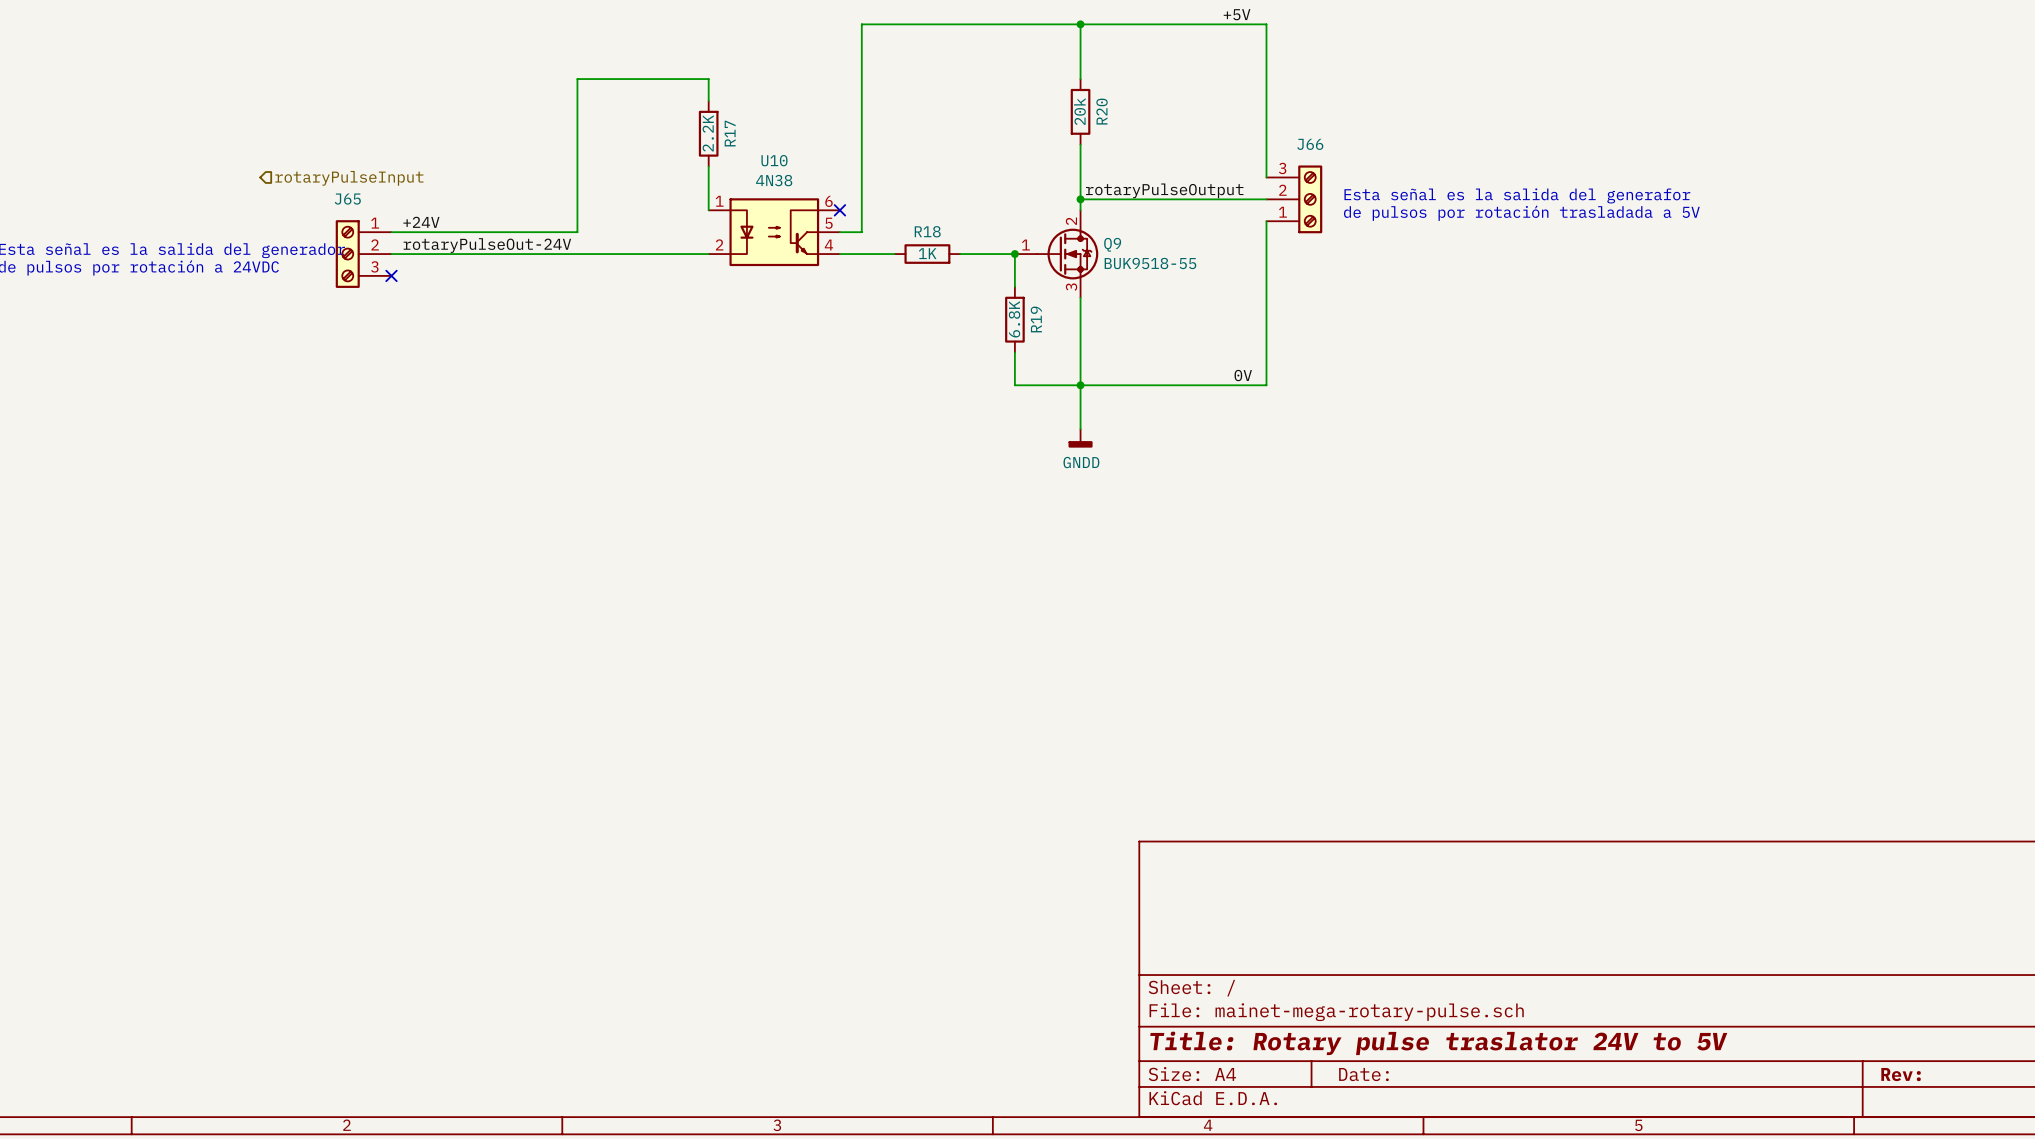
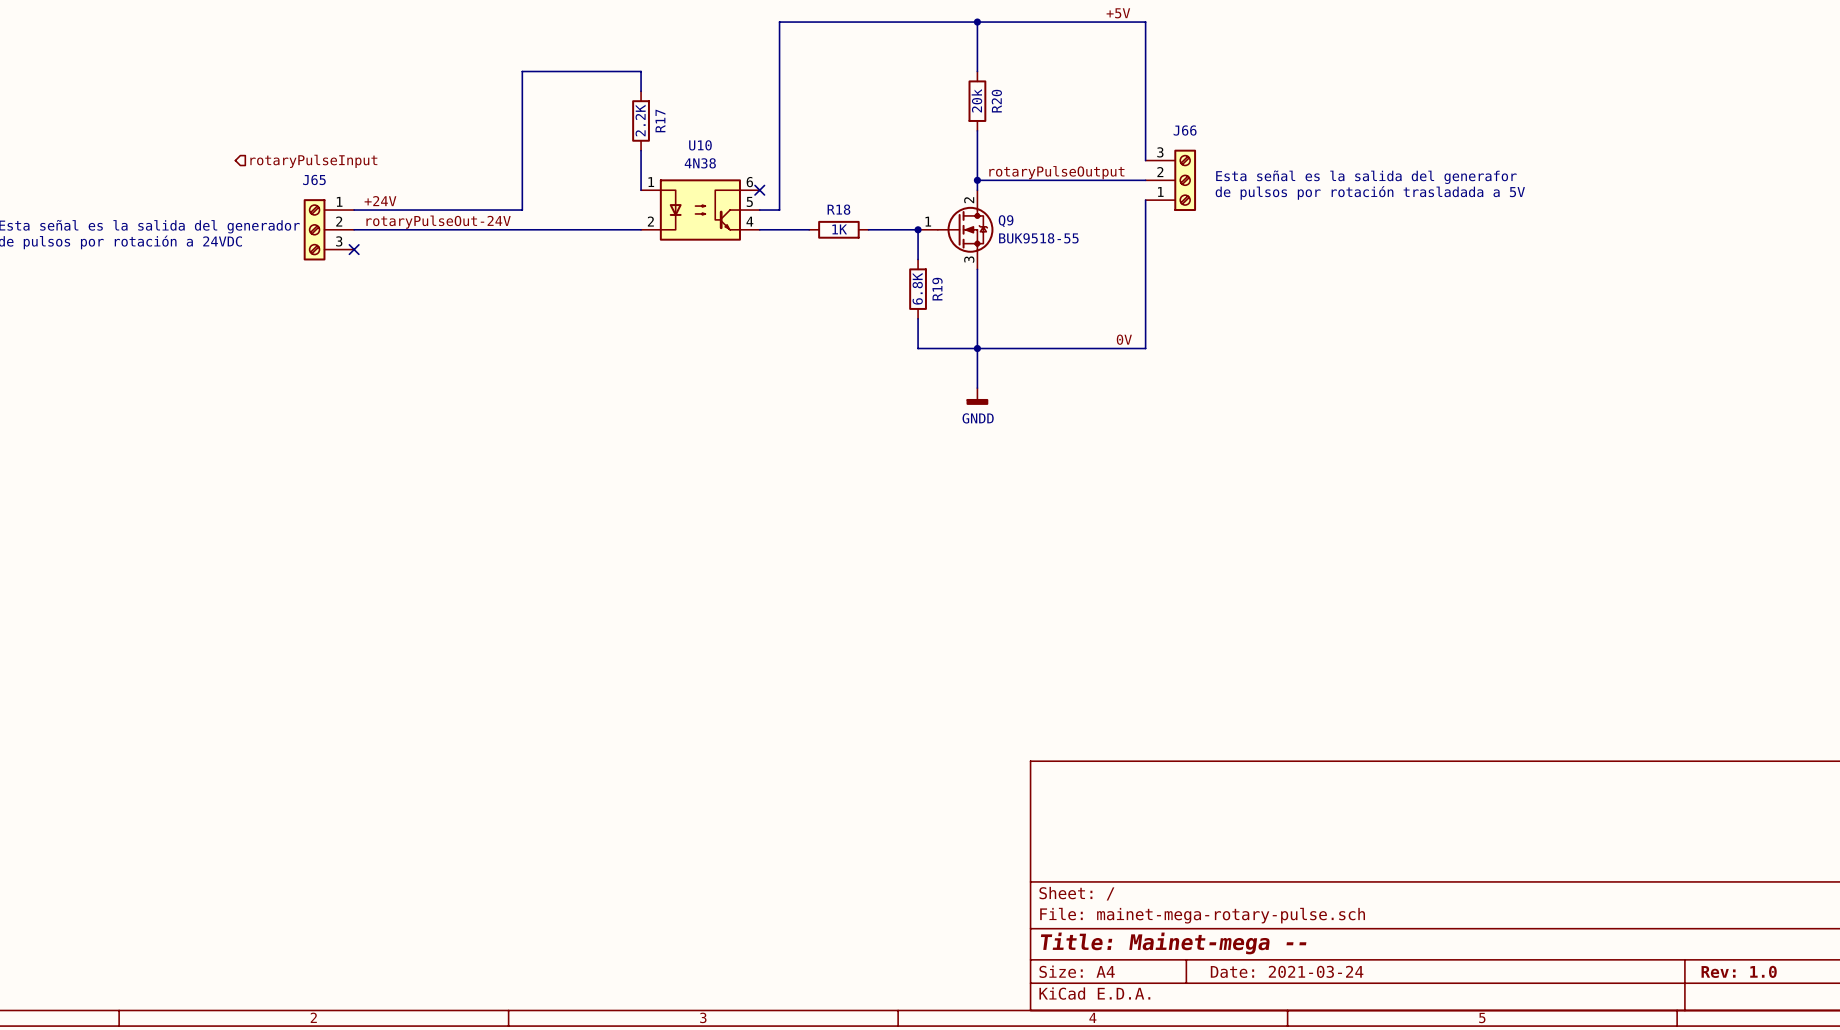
title block: Title: Rotary pulse traslator 24V to 5V (1438, 1043) -> Title: Mainet-mega -- (1173, 943)
title block: Date: (1363, 1074) -> Date: 2021-03-24 (1287, 971)
title block: Rev: (1901, 1074) -> Rev: 1.0 (1739, 971)

